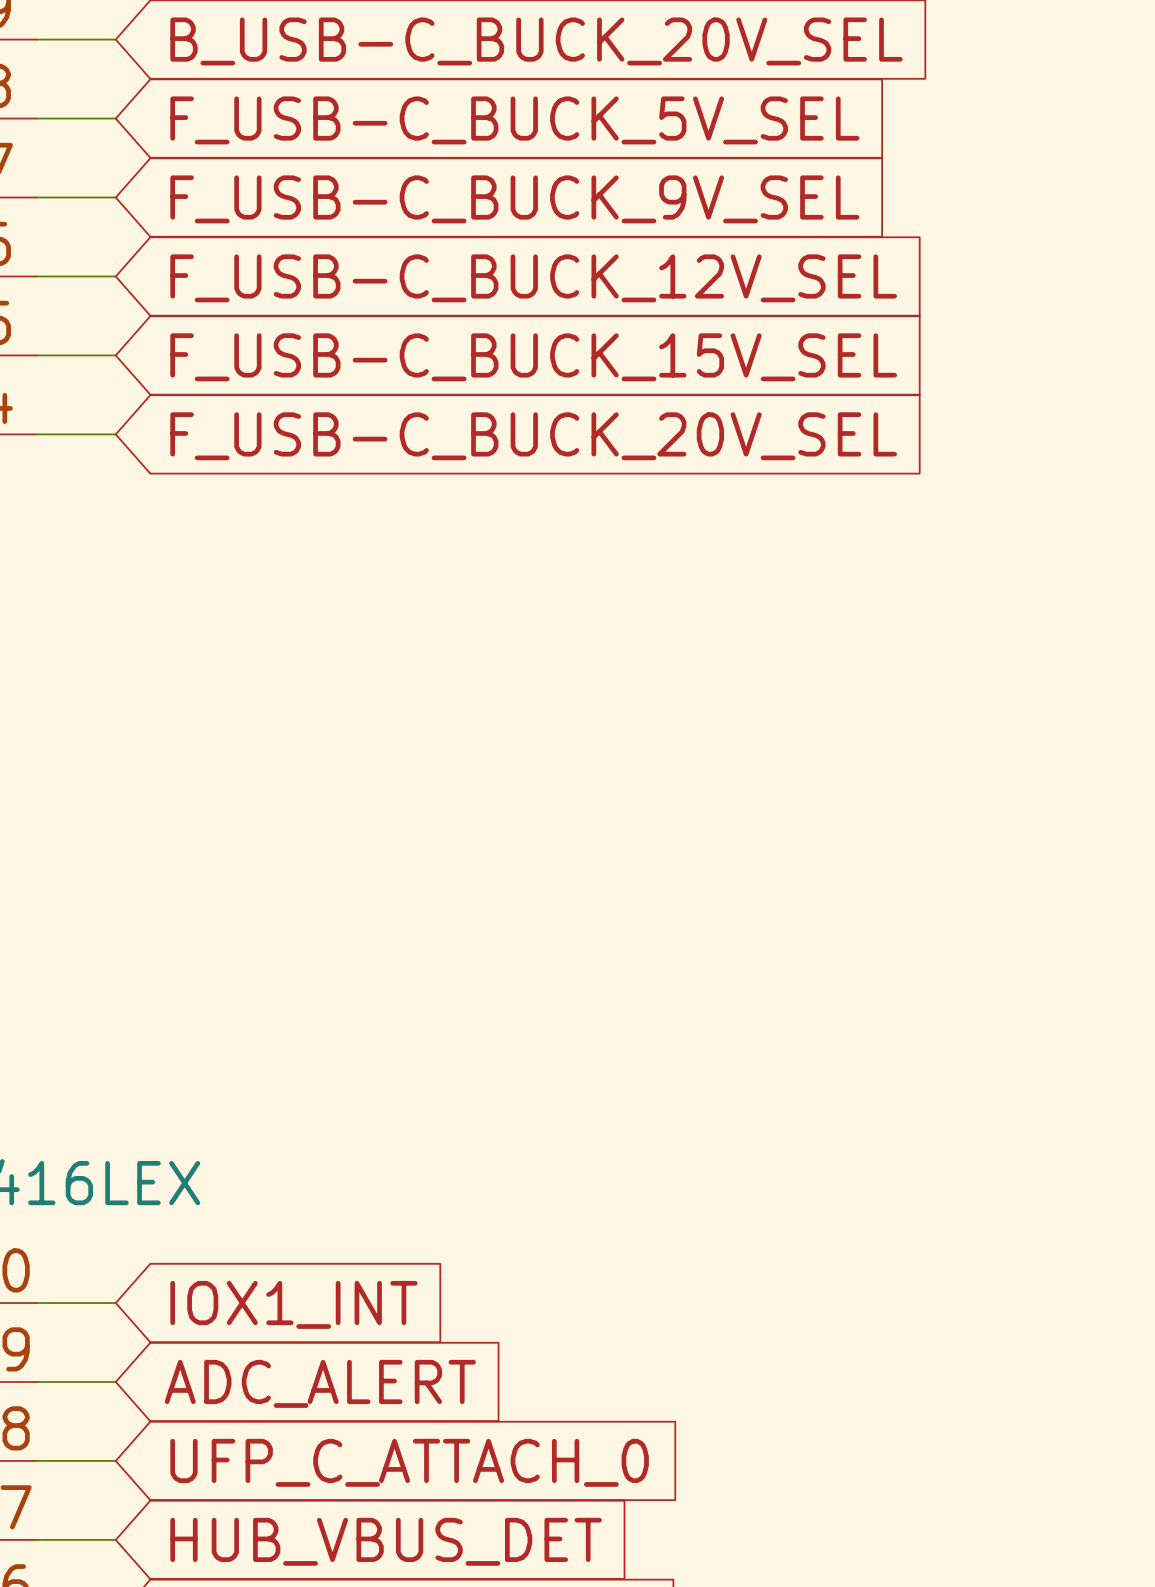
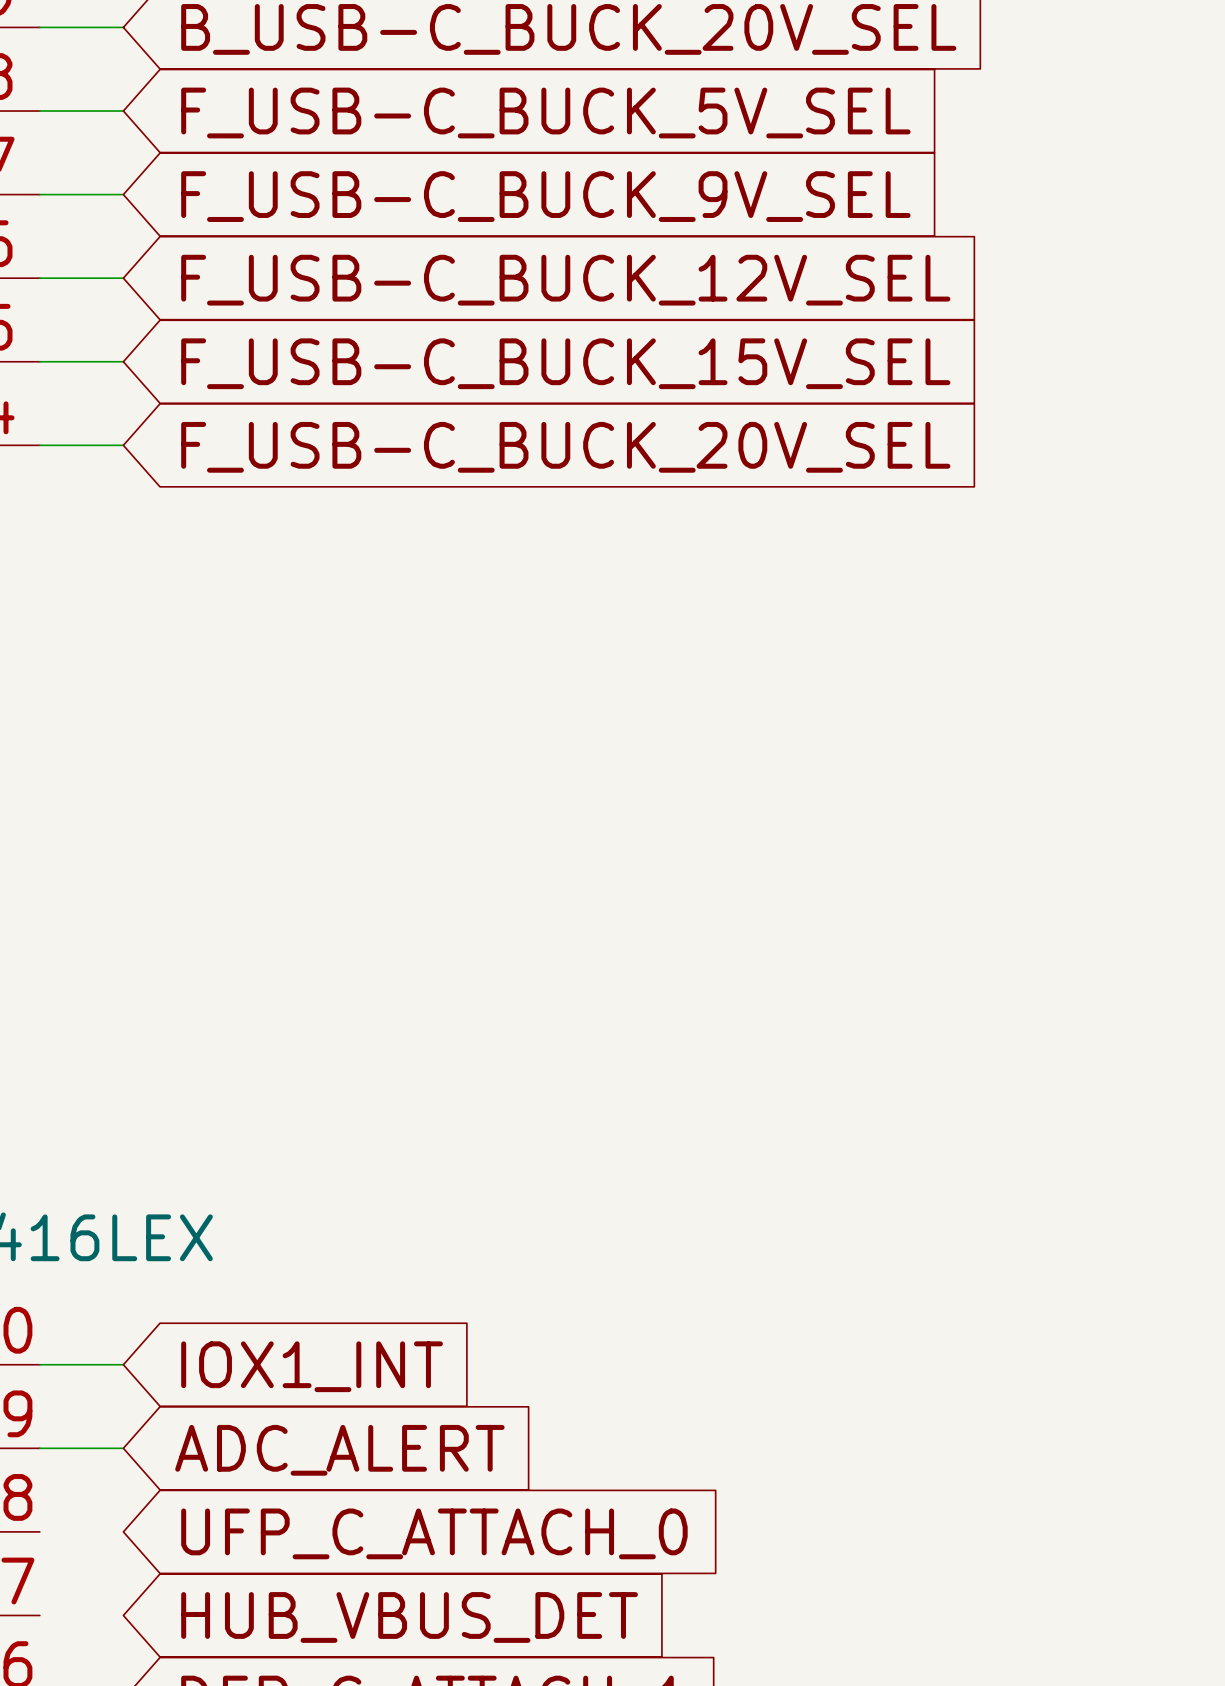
wire: (36, 1460) (115, 1460) -> none
wire: (36, 1539) (115, 1539) -> none

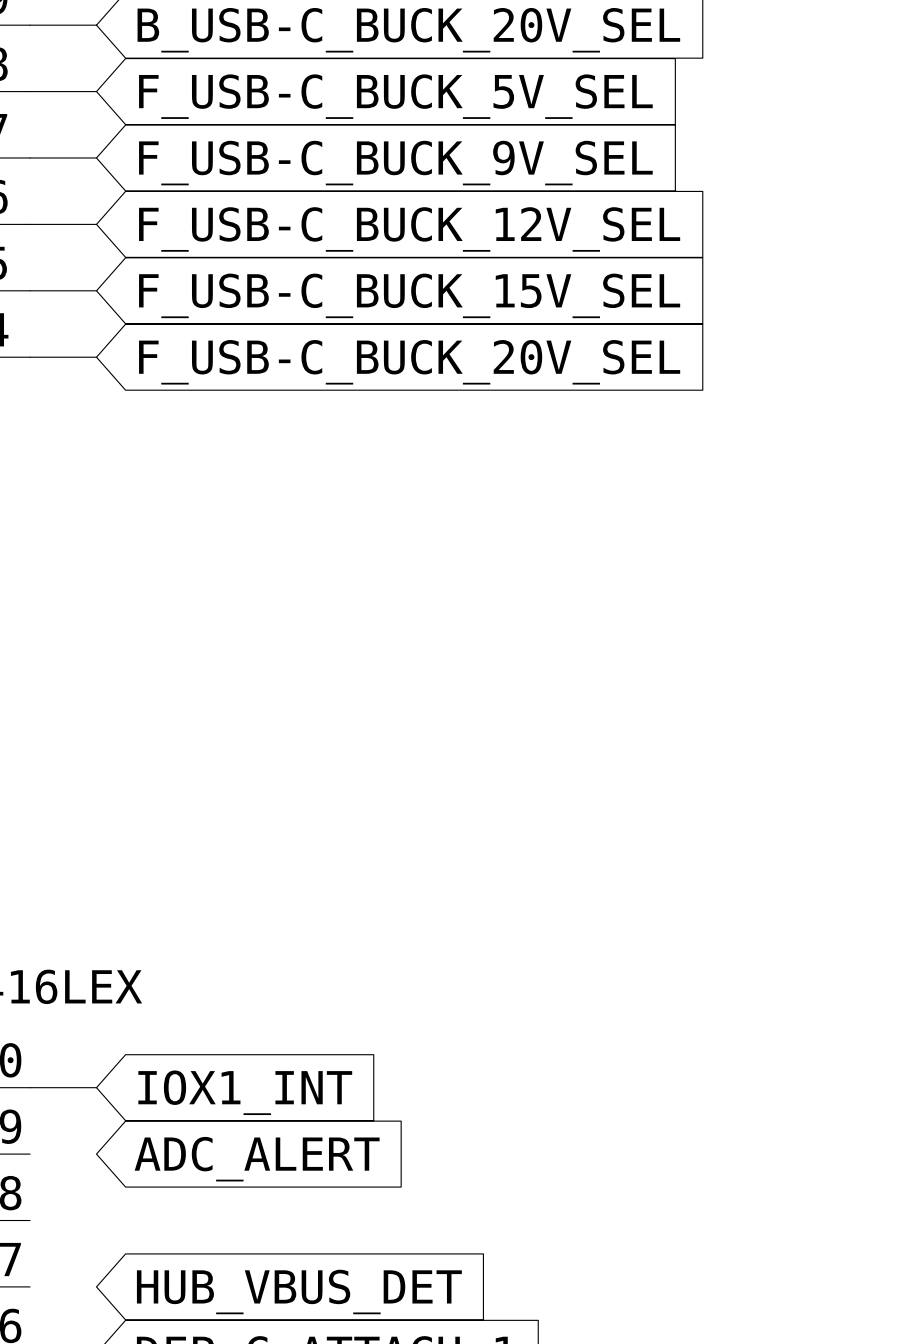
wire: (39, 1448) (123, 1448) -> none
global label: UFP_C_ATTACH_0 (434, 1533) -> none

